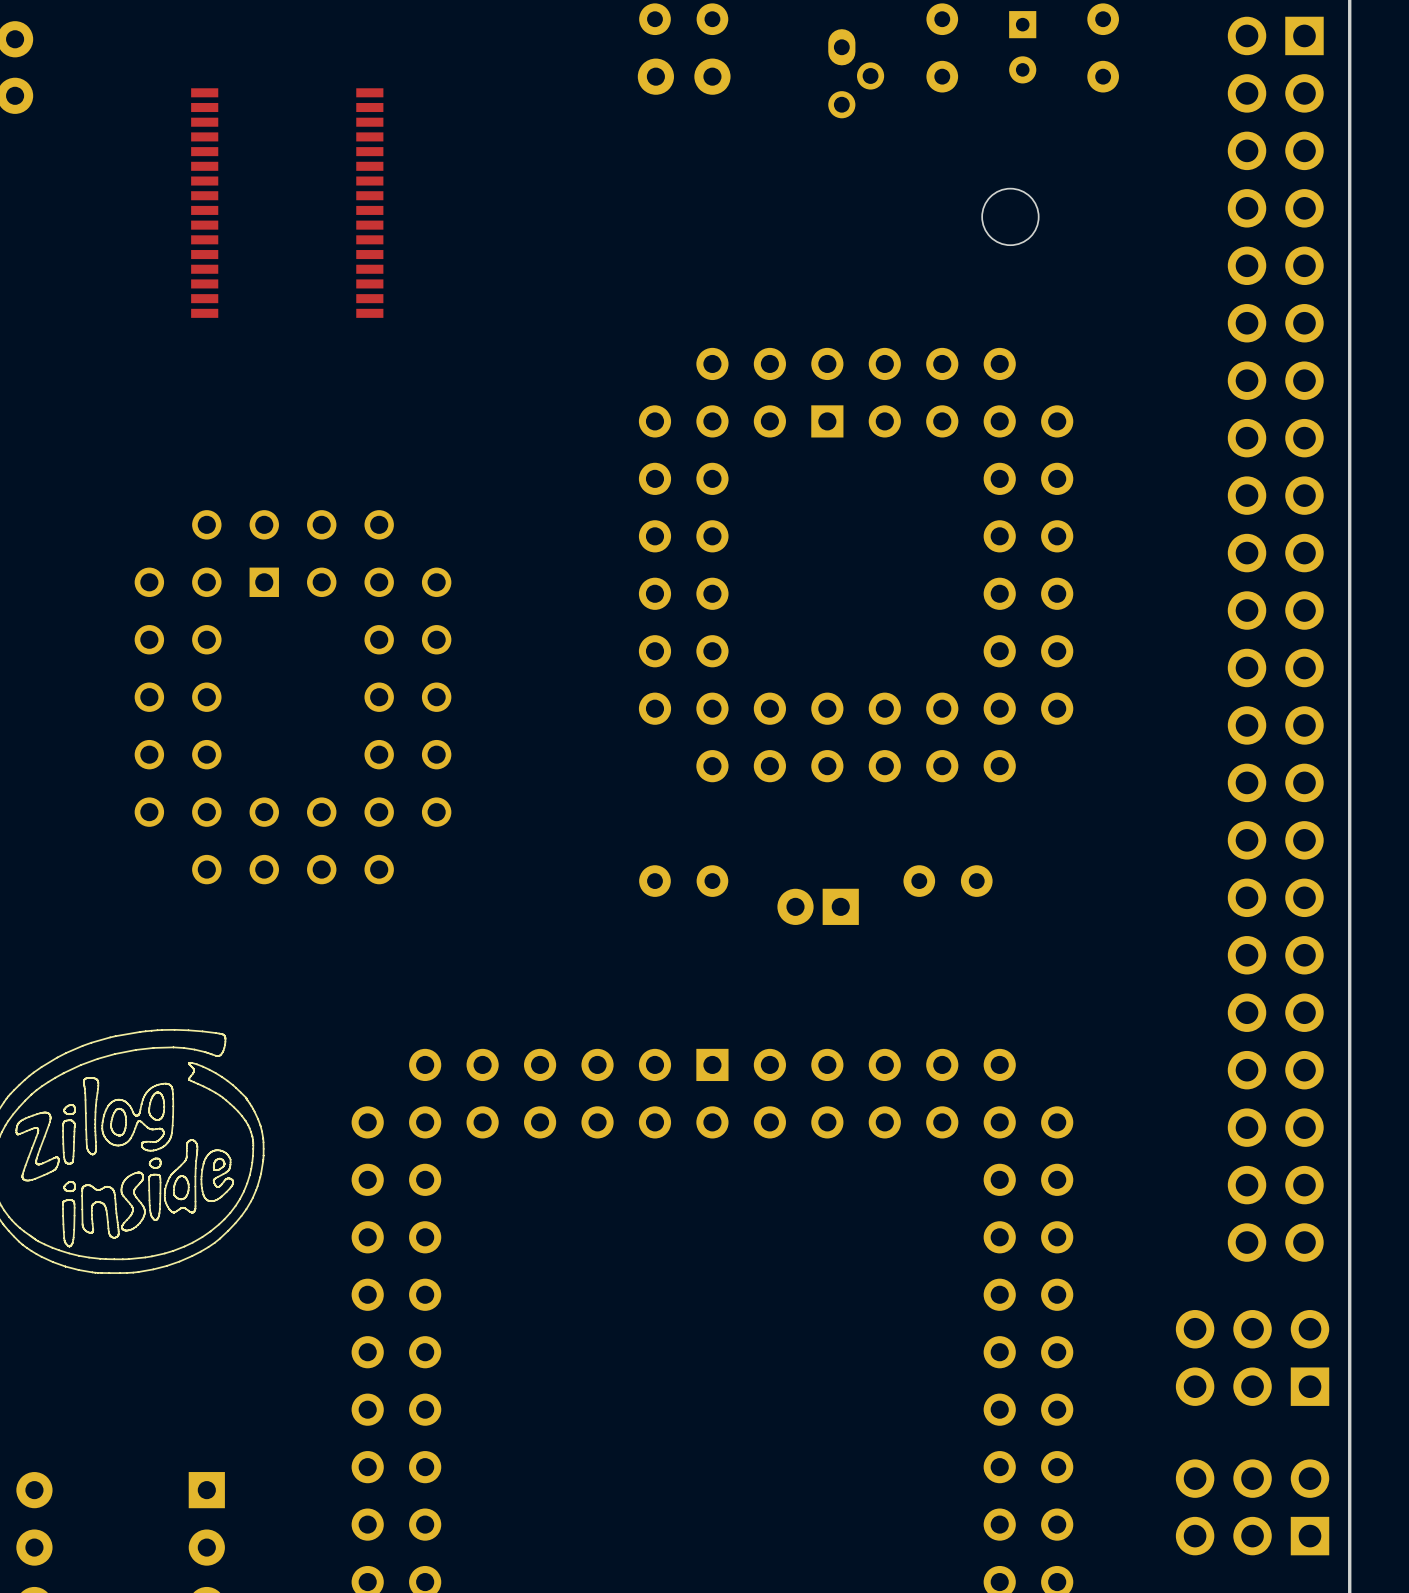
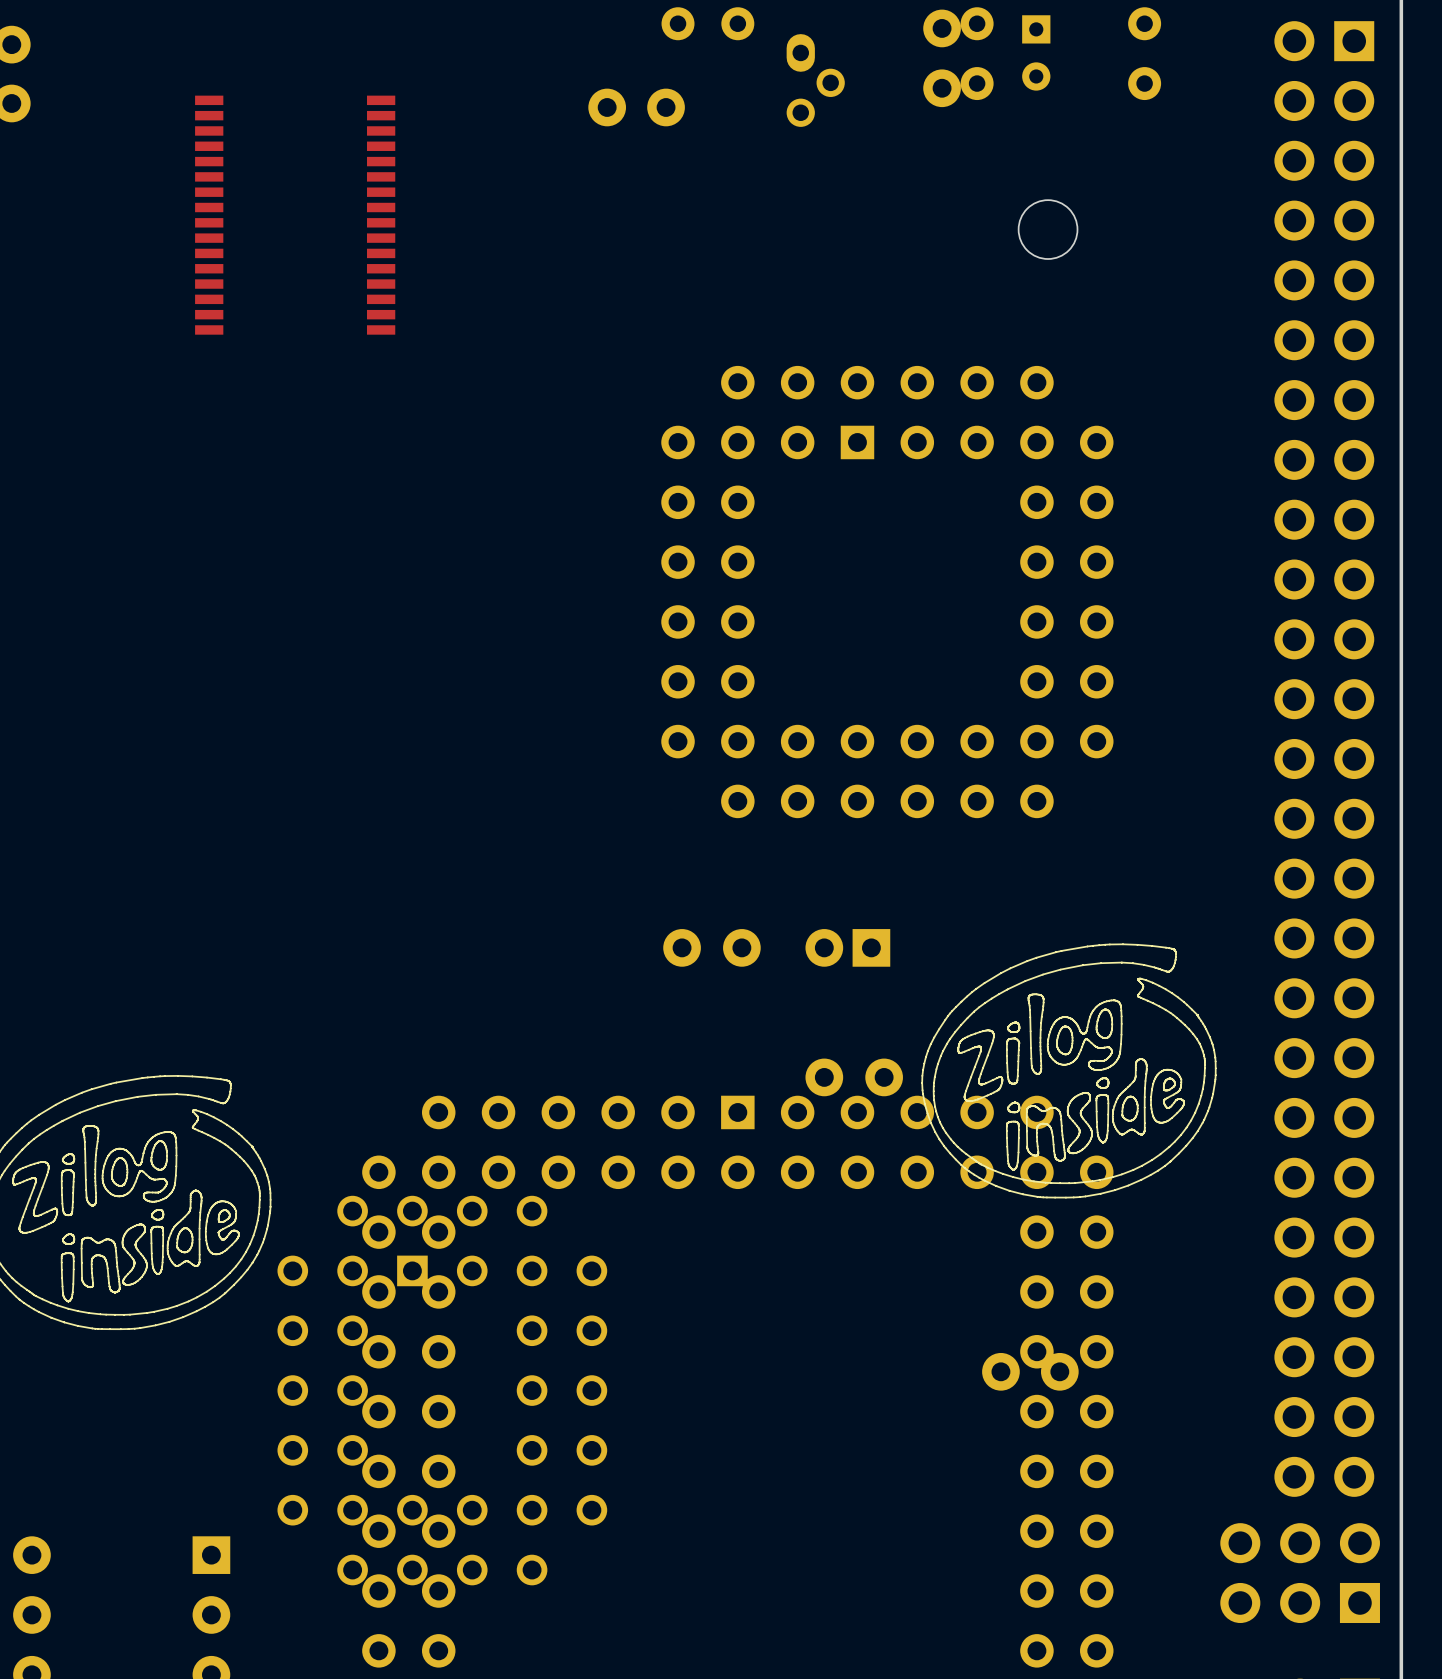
part position: (1022, 47) -> (1036, 52)
part: none -> (942, 58)
part position: (856, 73) -> (815, 80)
part position: (684, 76) -> (636, 107)
part: (293, 697) -> none
part: none -> (1324, 759)
part: (683, 881) -> none
part: (948, 881) -> none
drawing: none -> [921, 943, 1217, 1199]
part: none -> (711, 947)
part: none -> (854, 1077)
part: none -> (1030, 1371)
part: none -> (442, 1390)
part: (1252, 1357) -> none

